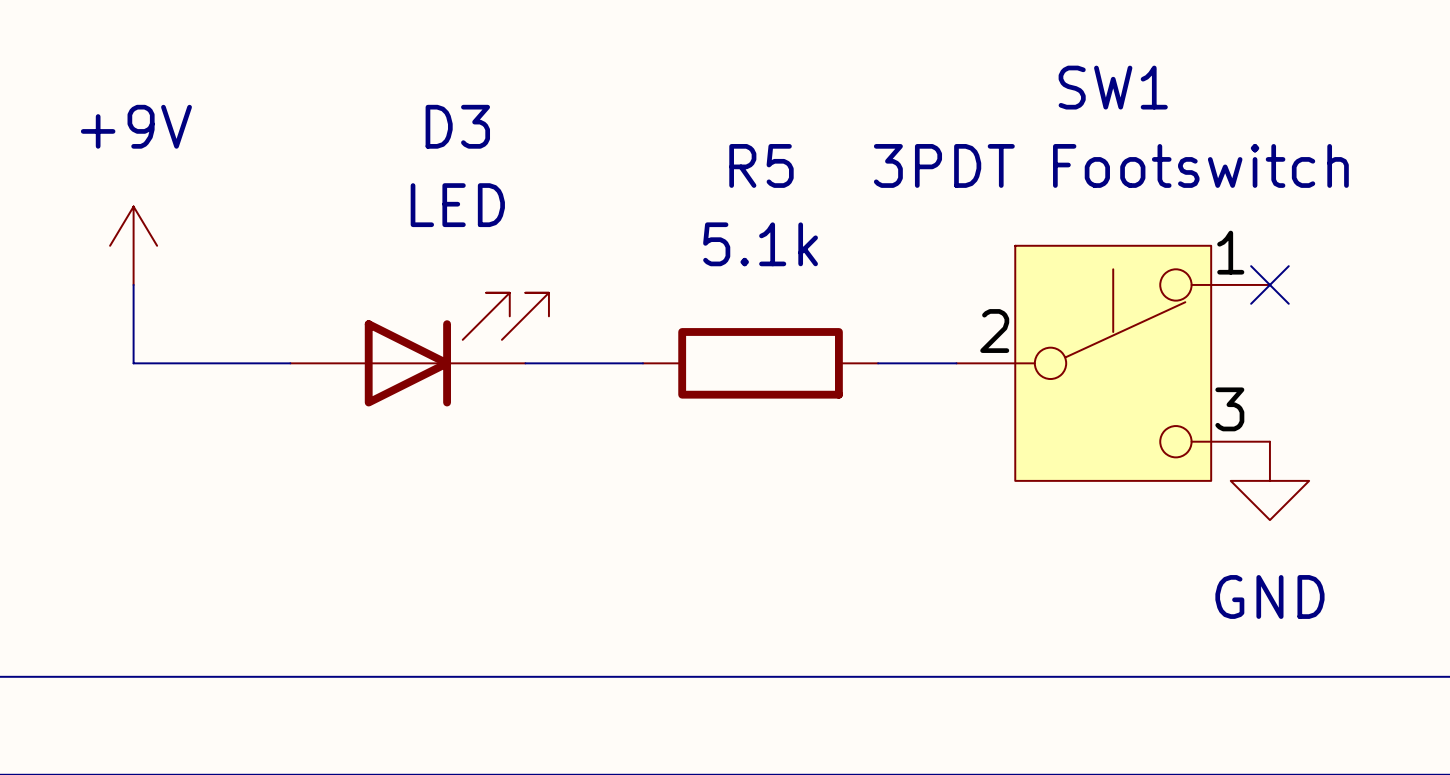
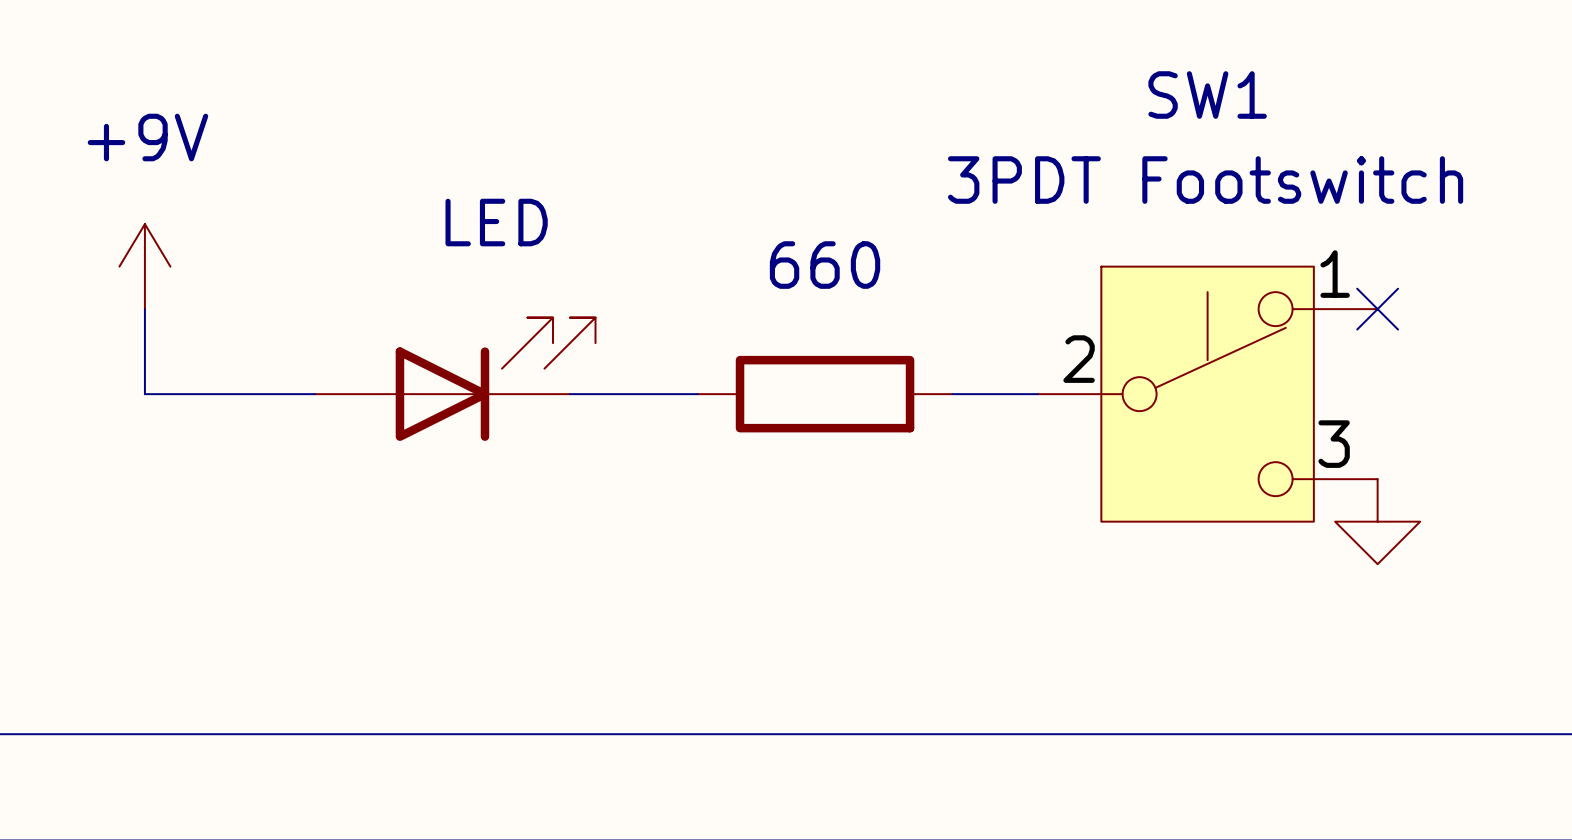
D3 name: D3 (457, 126) -> none
R5 name: R5 (761, 165) -> none
R5 value: 5.1k (760, 244) -> 660 (825, 265)
power symbol text: GND (1269, 596) -> none

